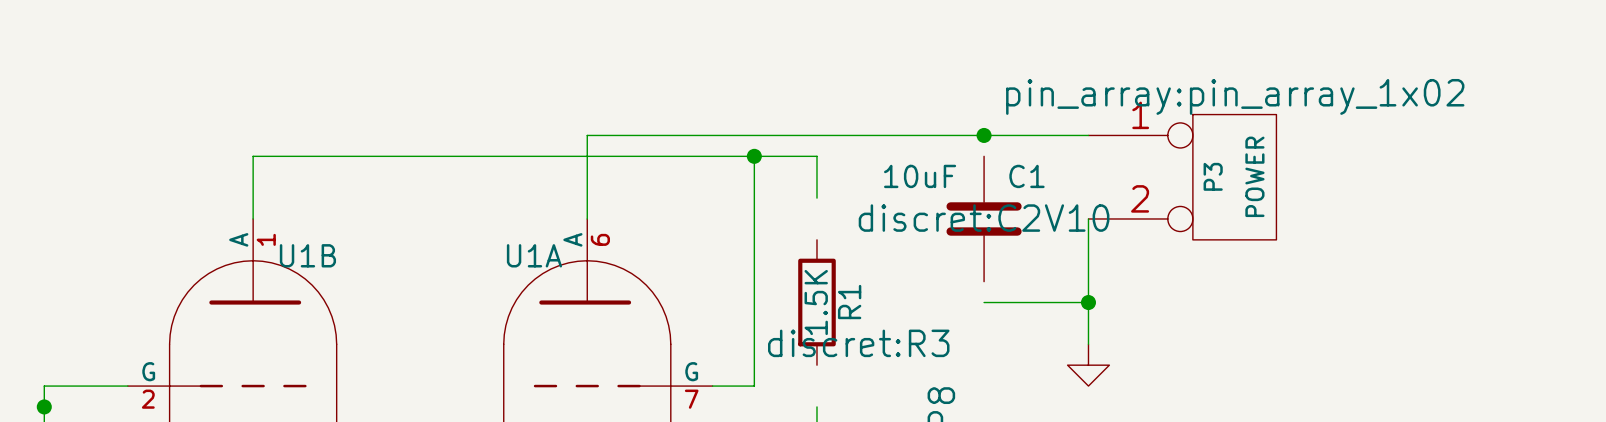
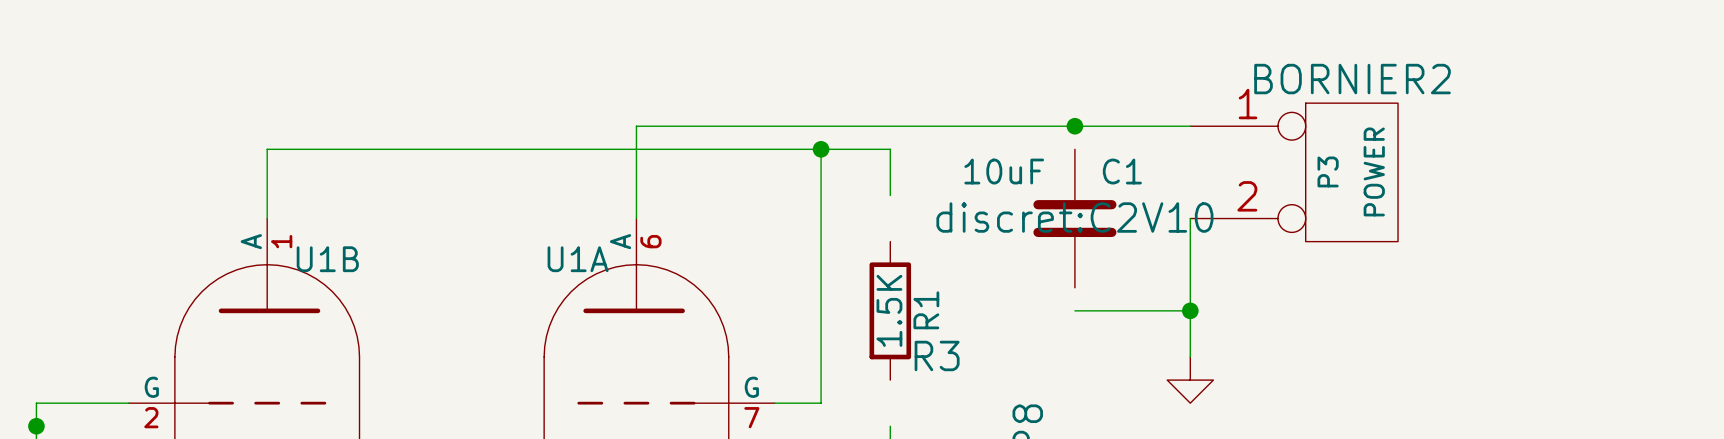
P3 text: pin_array:pin_array_1x02 (1235, 96) -> BORNIER2 (1352, 79)
R1 text: discret:R3 (858, 343) -> R3 (937, 355)

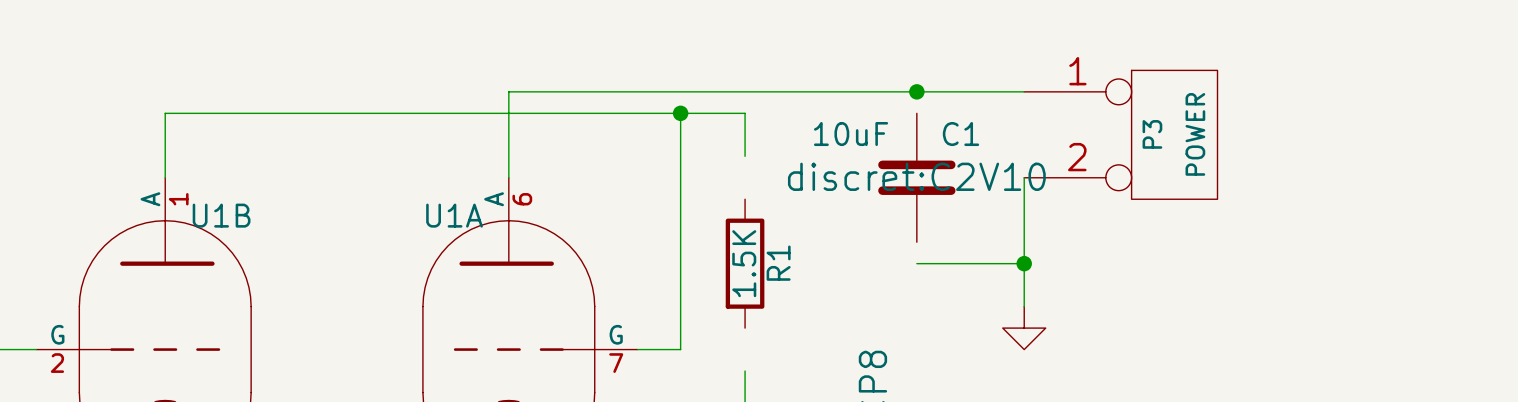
P3 text: BORNIER2 (1352, 79) -> none
R1 text: R3 (937, 355) -> none

